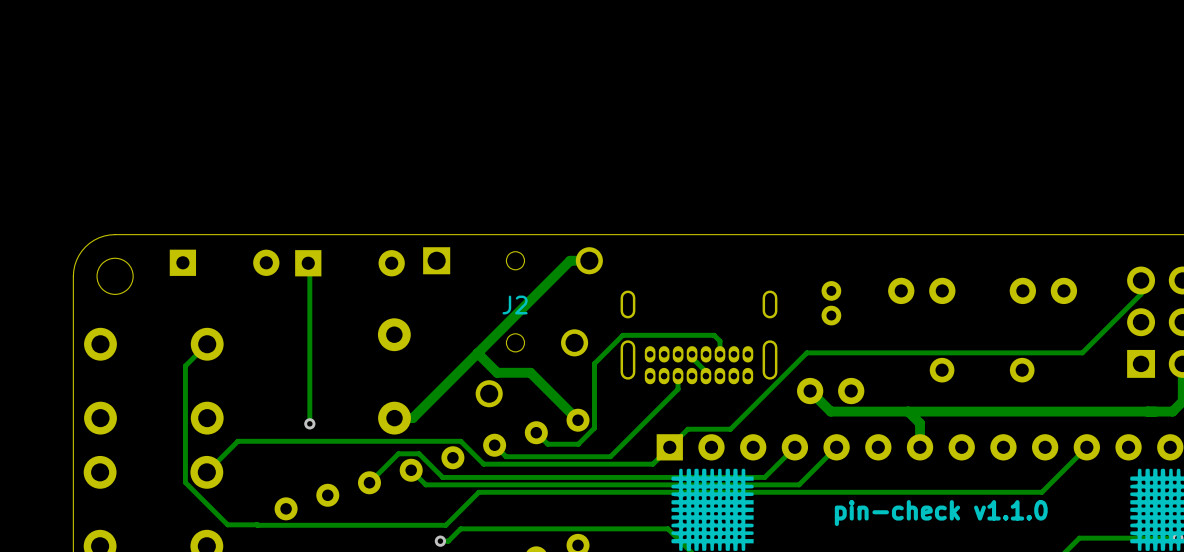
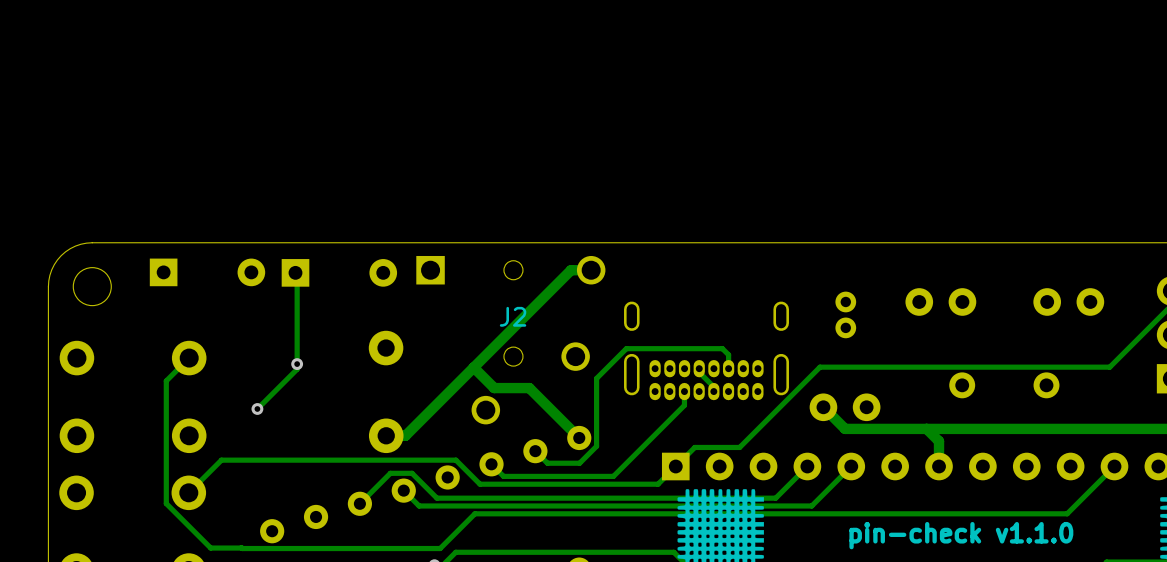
via: none -> (297, 364)
track: (309, 354) (309, 423) -> (297, 369) (257, 408)
via: none -> (257, 408)
via: (309, 423) -> none

